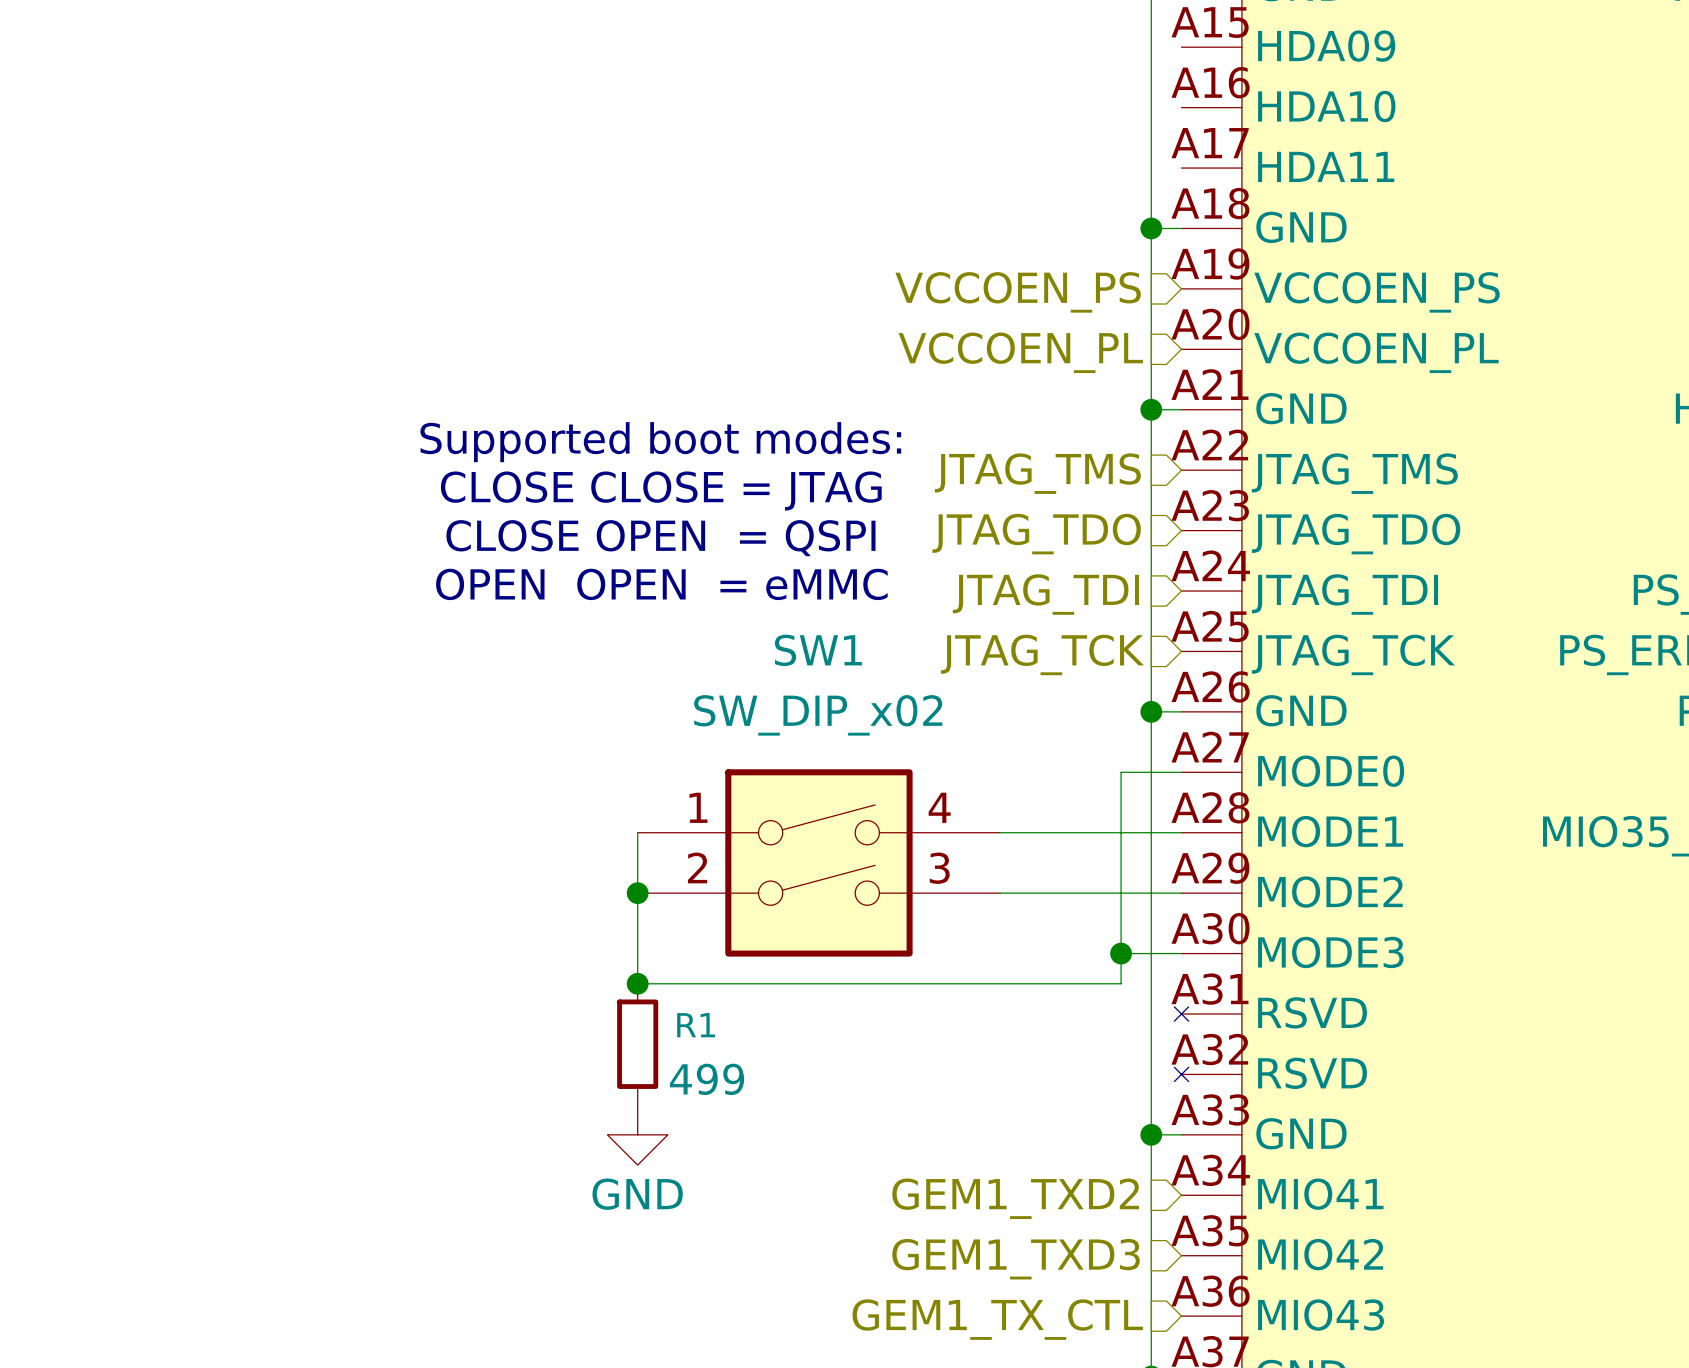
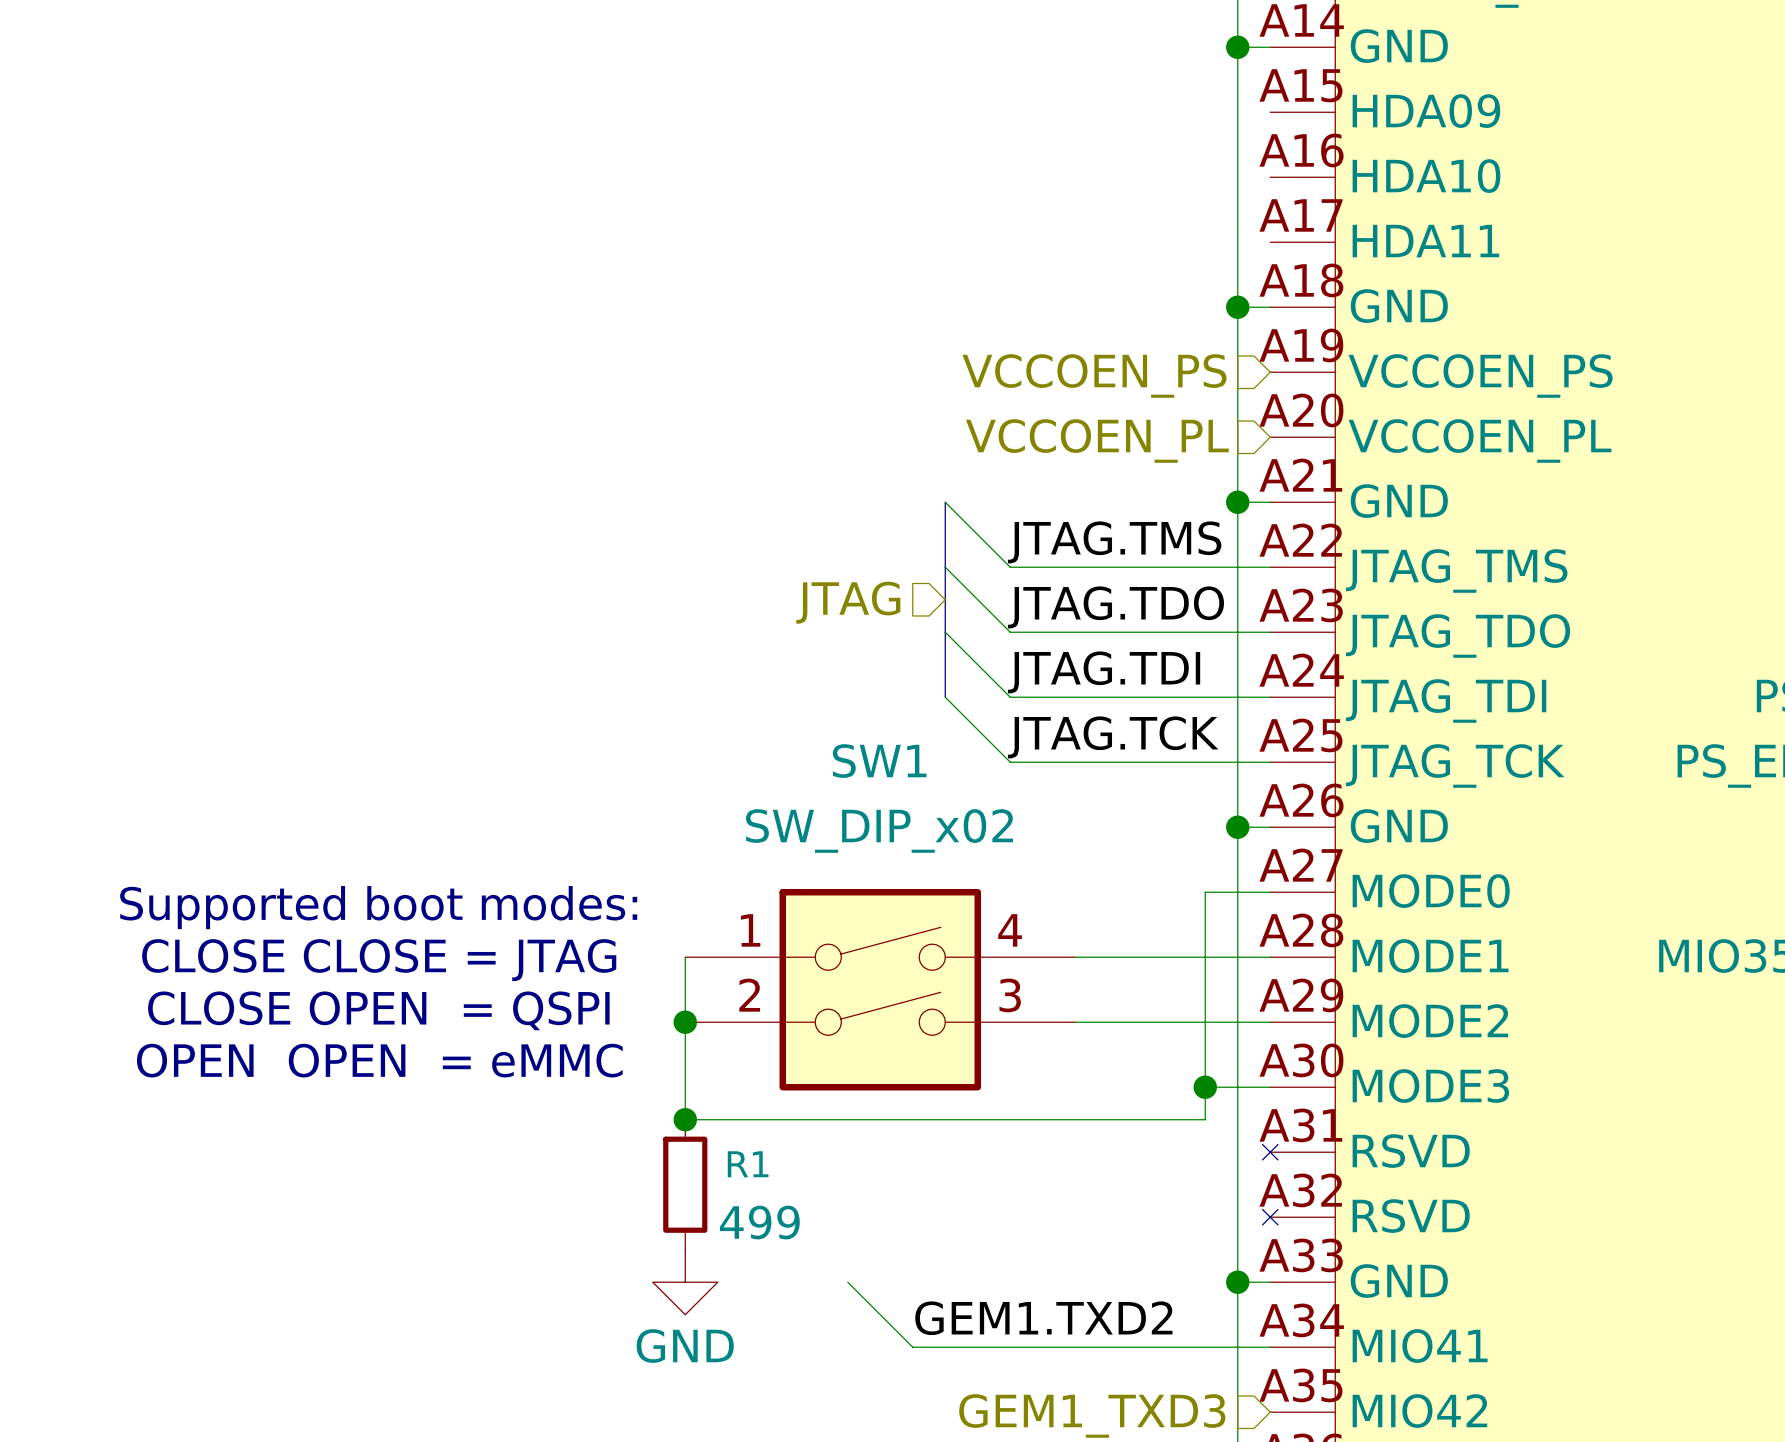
wire: none -> (945, 502) (1010, 567) (1270, 567)
bus: none -> (945, 502) (945, 697)
text position: Supported boot modes: (660, 442) -> Supported boot modes: (378, 907)
label: none -> JTAG.TMS (1114, 542)
wire: none -> (945, 567) (1010, 632) (1270, 632)
hierarchical label: JTAG_TMS (1037, 473) -> none
text position: CLOSE CLOSE = JTAG (661, 490) -> CLOSE CLOSE = JTAG (379, 960)
hierarchical label: none -> JTAG (848, 602)
label: none -> JTAG.TDO (1115, 607)
wire: none -> (945, 632) (1010, 697) (1270, 697)
hierarchical label: JTAG_TDO (1036, 534) -> none
text position: CLOSE OPEN = QSPI (660, 538) -> CLOSE OPEN = QSPI (378, 1010)
label: none -> JTAG.TDI (1104, 672)
text position: OPEN OPEN = eMMC (661, 584) -> OPEN OPEN = eMMC (379, 1060)
wire: none -> (945, 697) (1010, 762) (1270, 762)
hierarchical label: JTAG_TDI (1045, 594) -> none
label: none -> JTAG.TCK (1113, 737)
hierarchical label: JTAG_TCK (1042, 654) -> none
wire: none -> (847, 1282) (912, 1347) (1270, 1347)
label: none -> GEM1.TXD2 (1043, 1318)
hierarchical label: GEM1_TXD2 (1015, 1198) -> none

